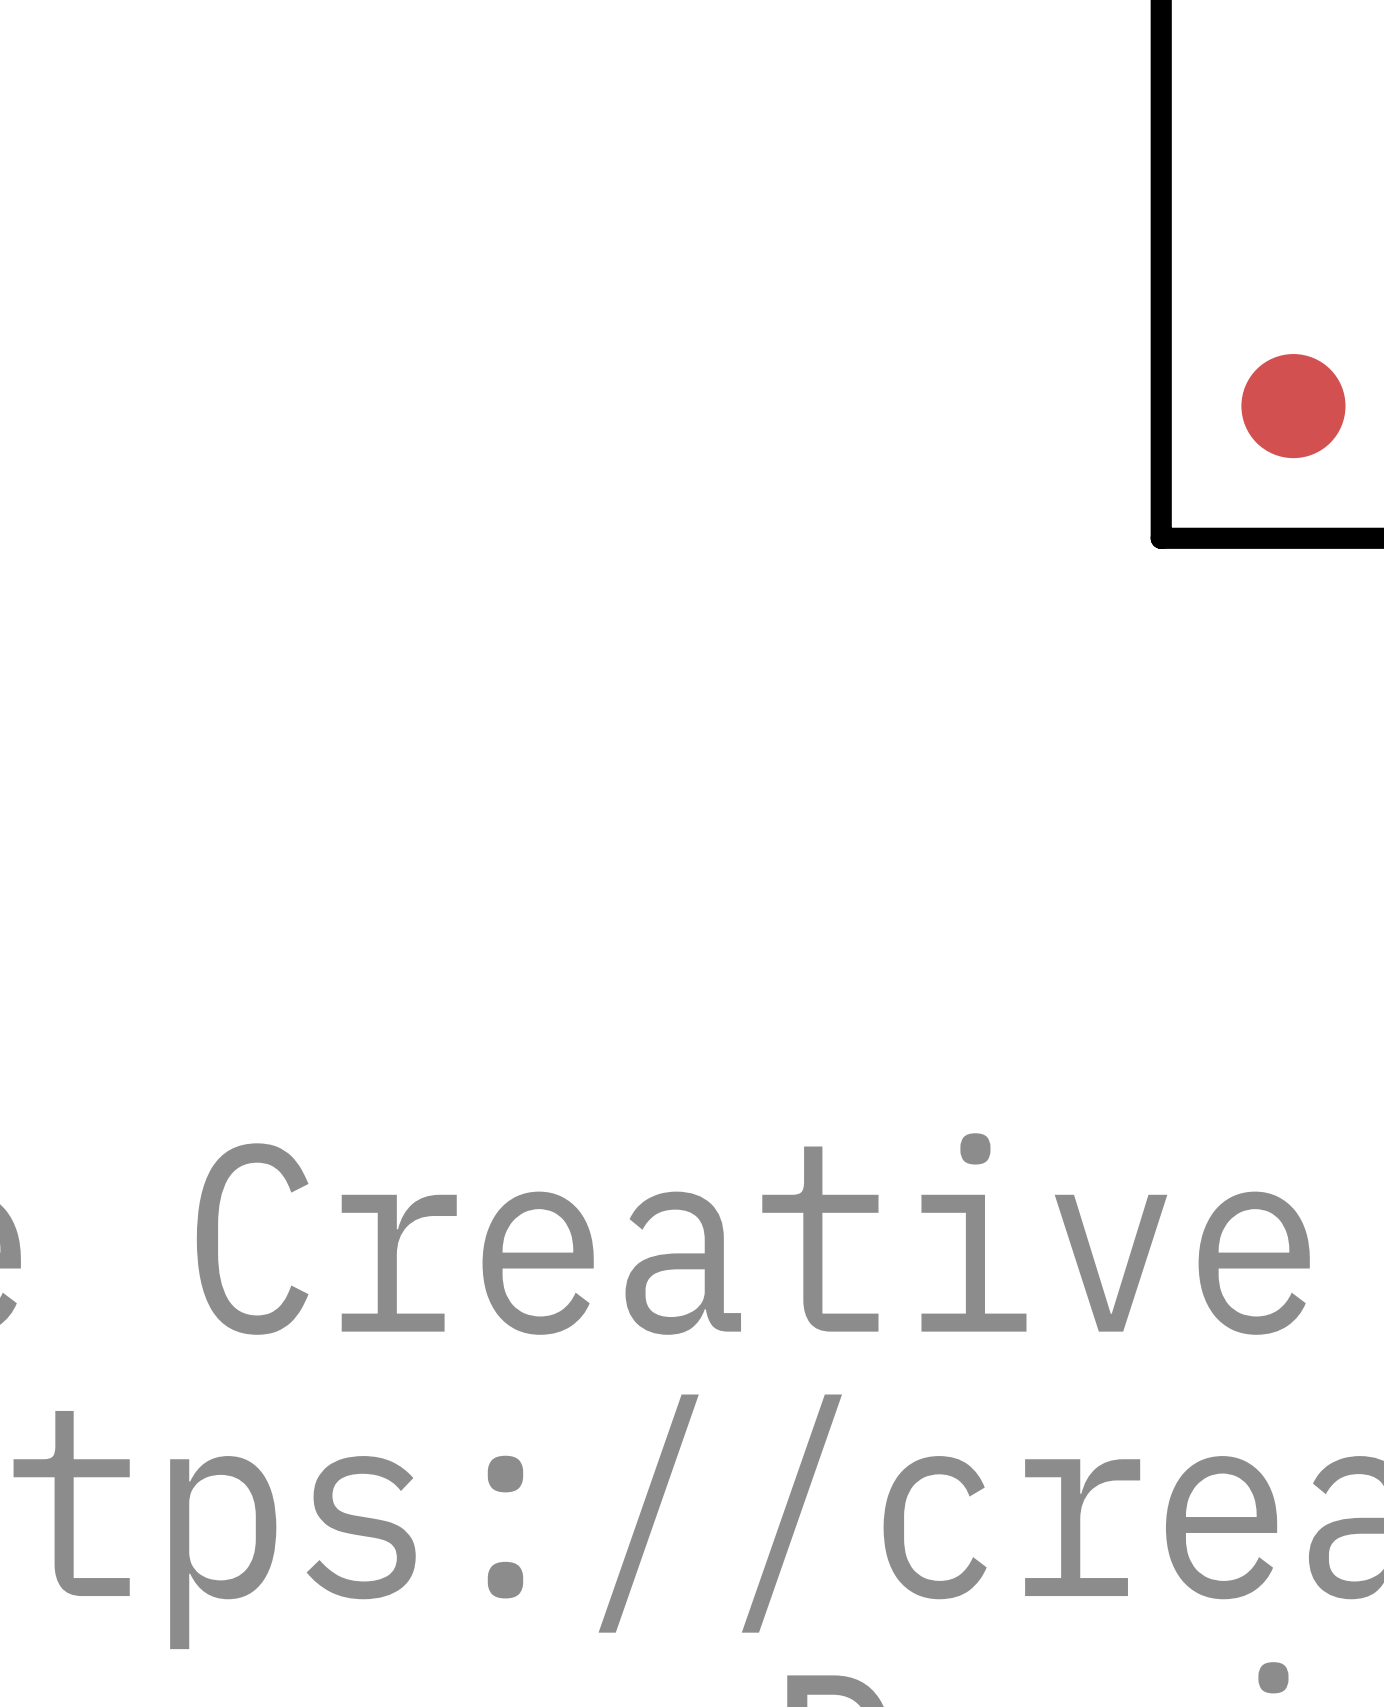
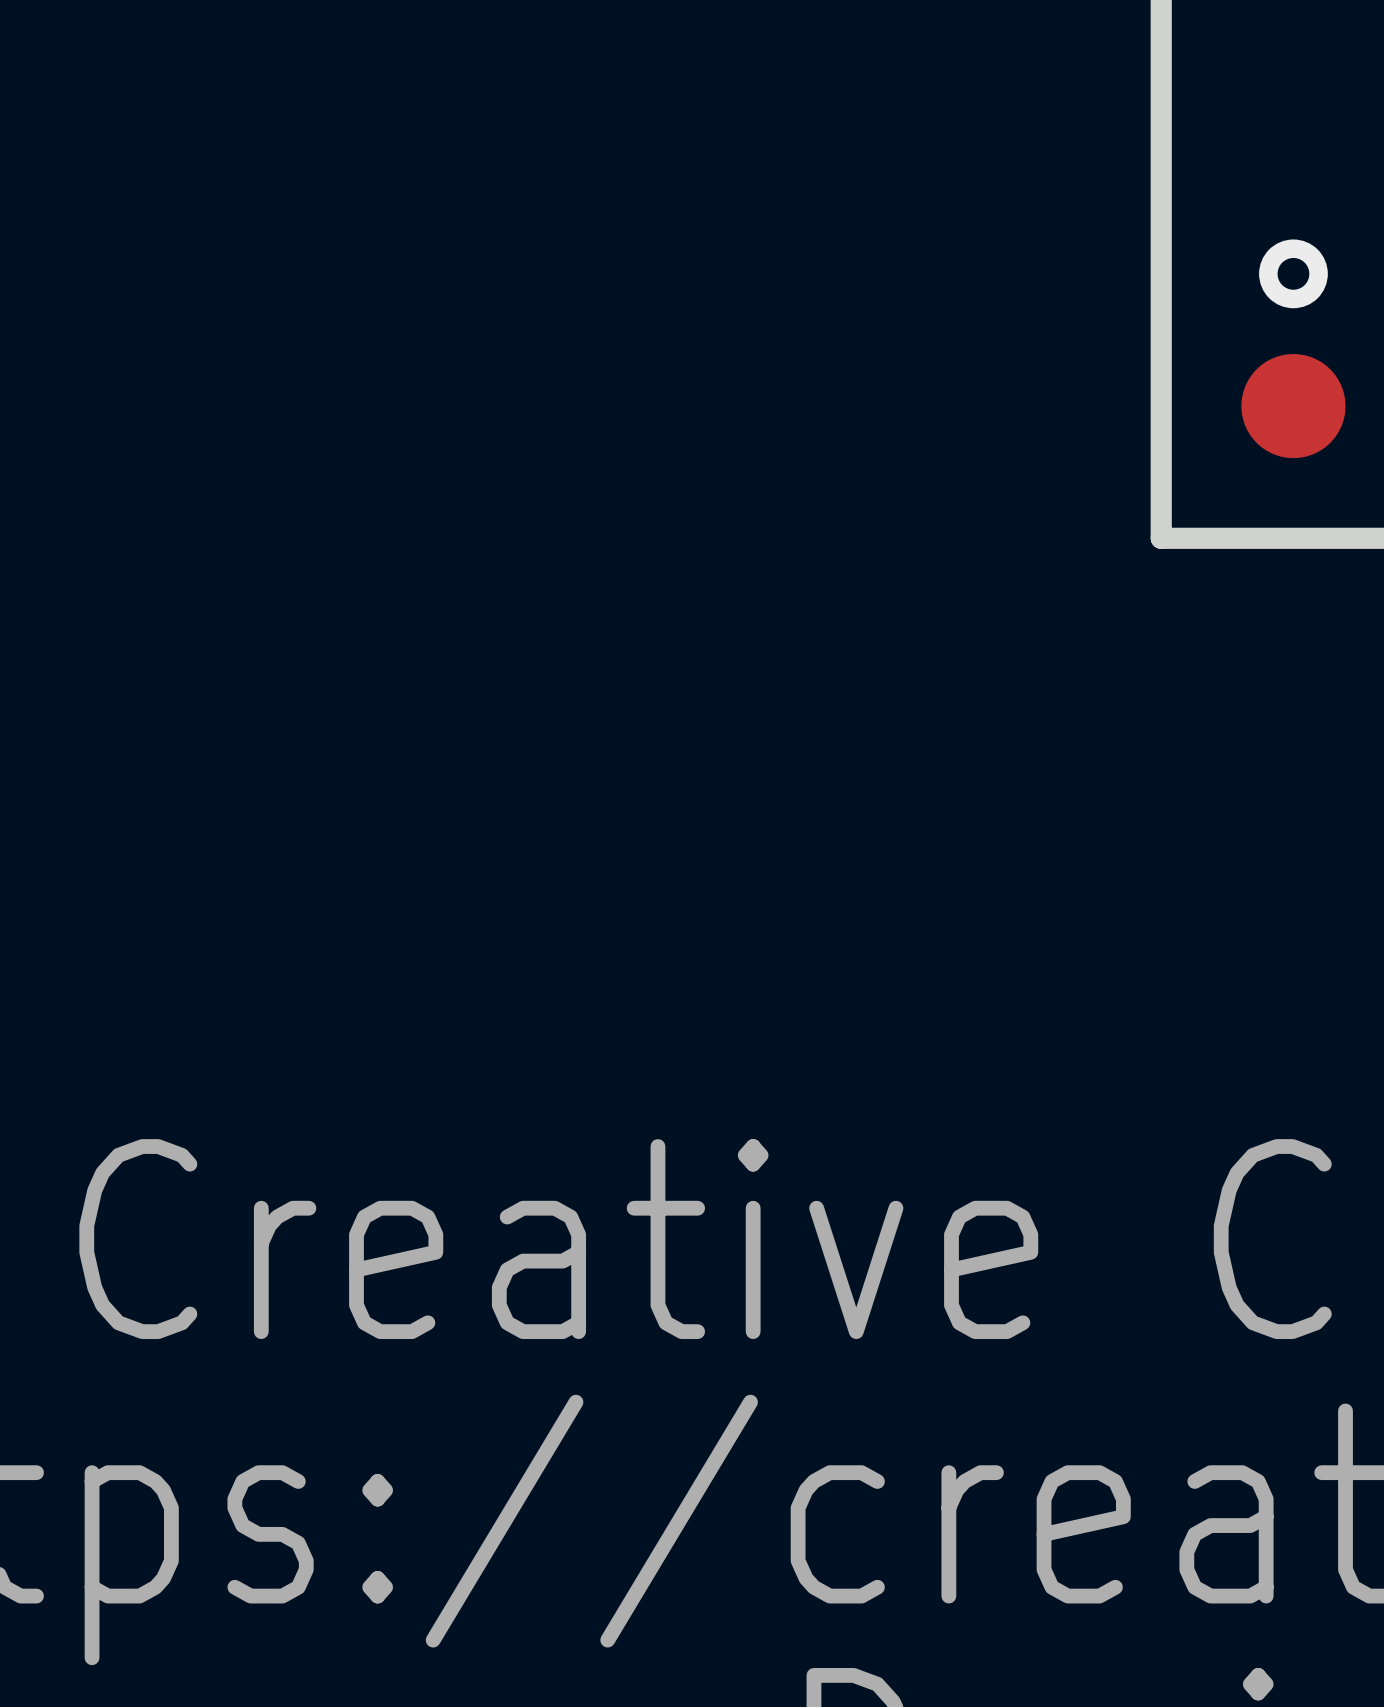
via: none -> (1293, 273)

